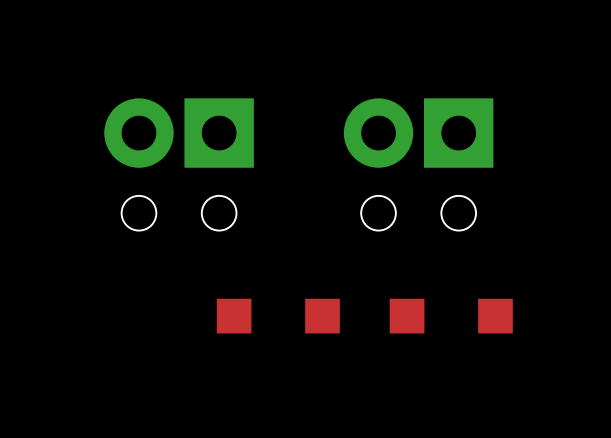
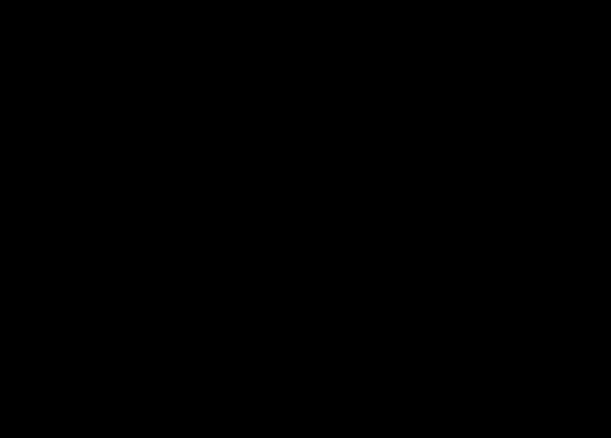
part: (179, 164) -> none
part: (418, 164) -> none
part: (278, 316) -> none
part: (451, 316) -> none

